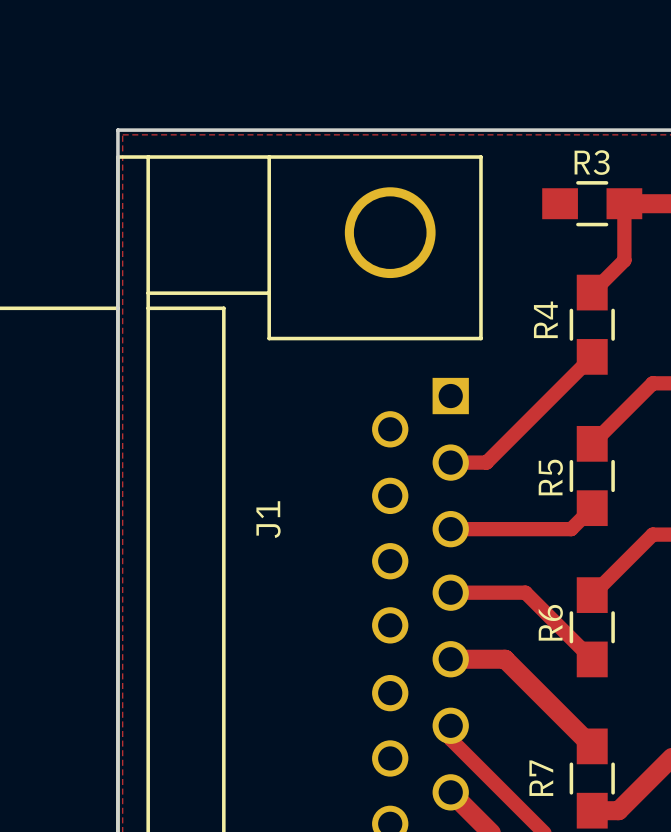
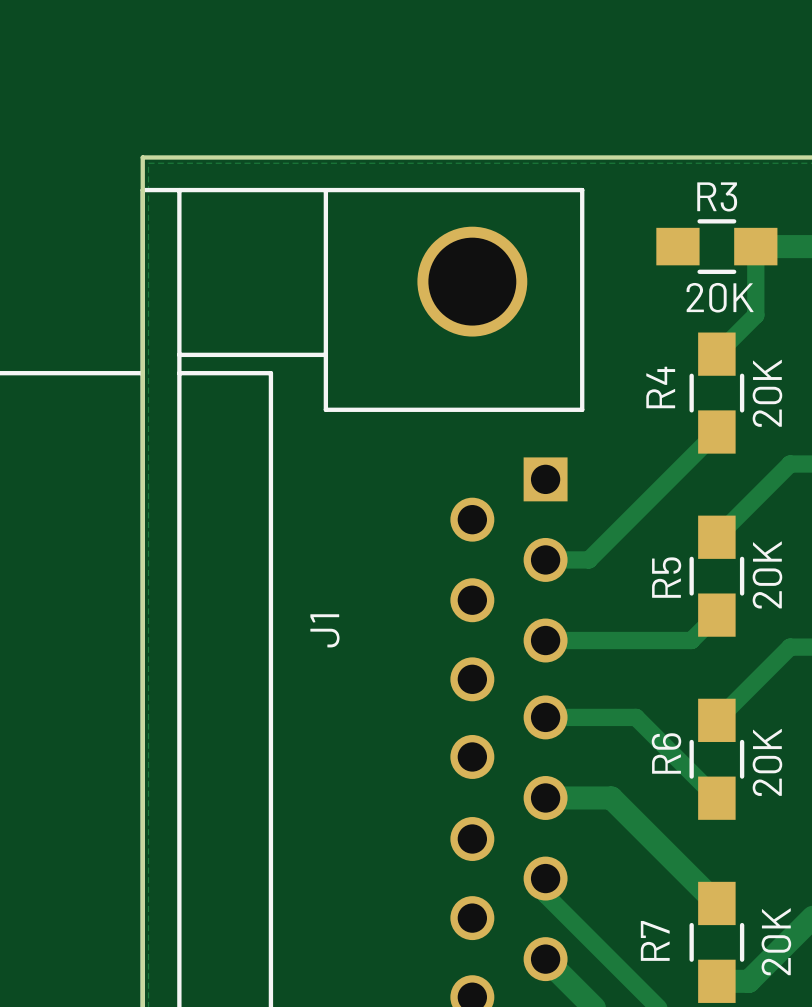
R3 value: none -> 20K (720, 297)
R4 value: none -> 20K (767, 393)
R5 value: none -> 20K (767, 574)
R6 value: none -> 20K (767, 762)
R7 value: none -> 20K (776, 941)

